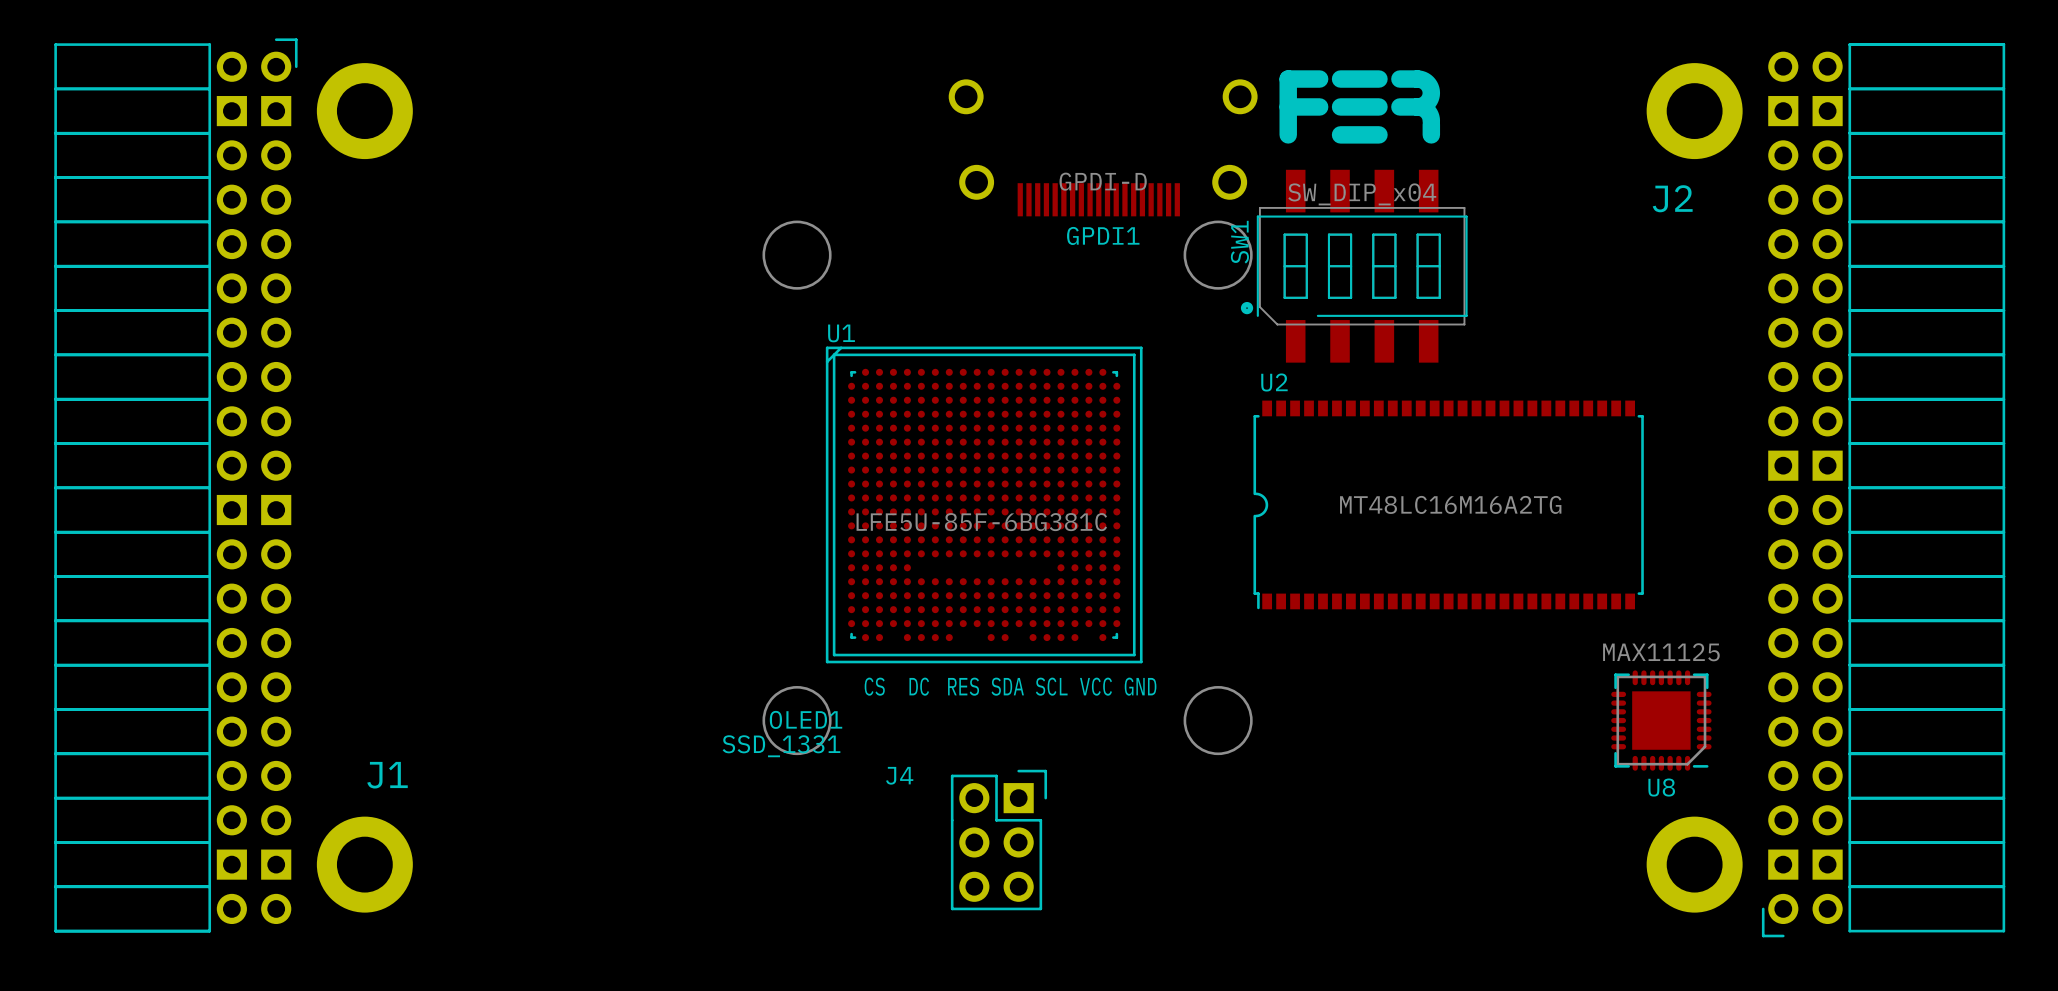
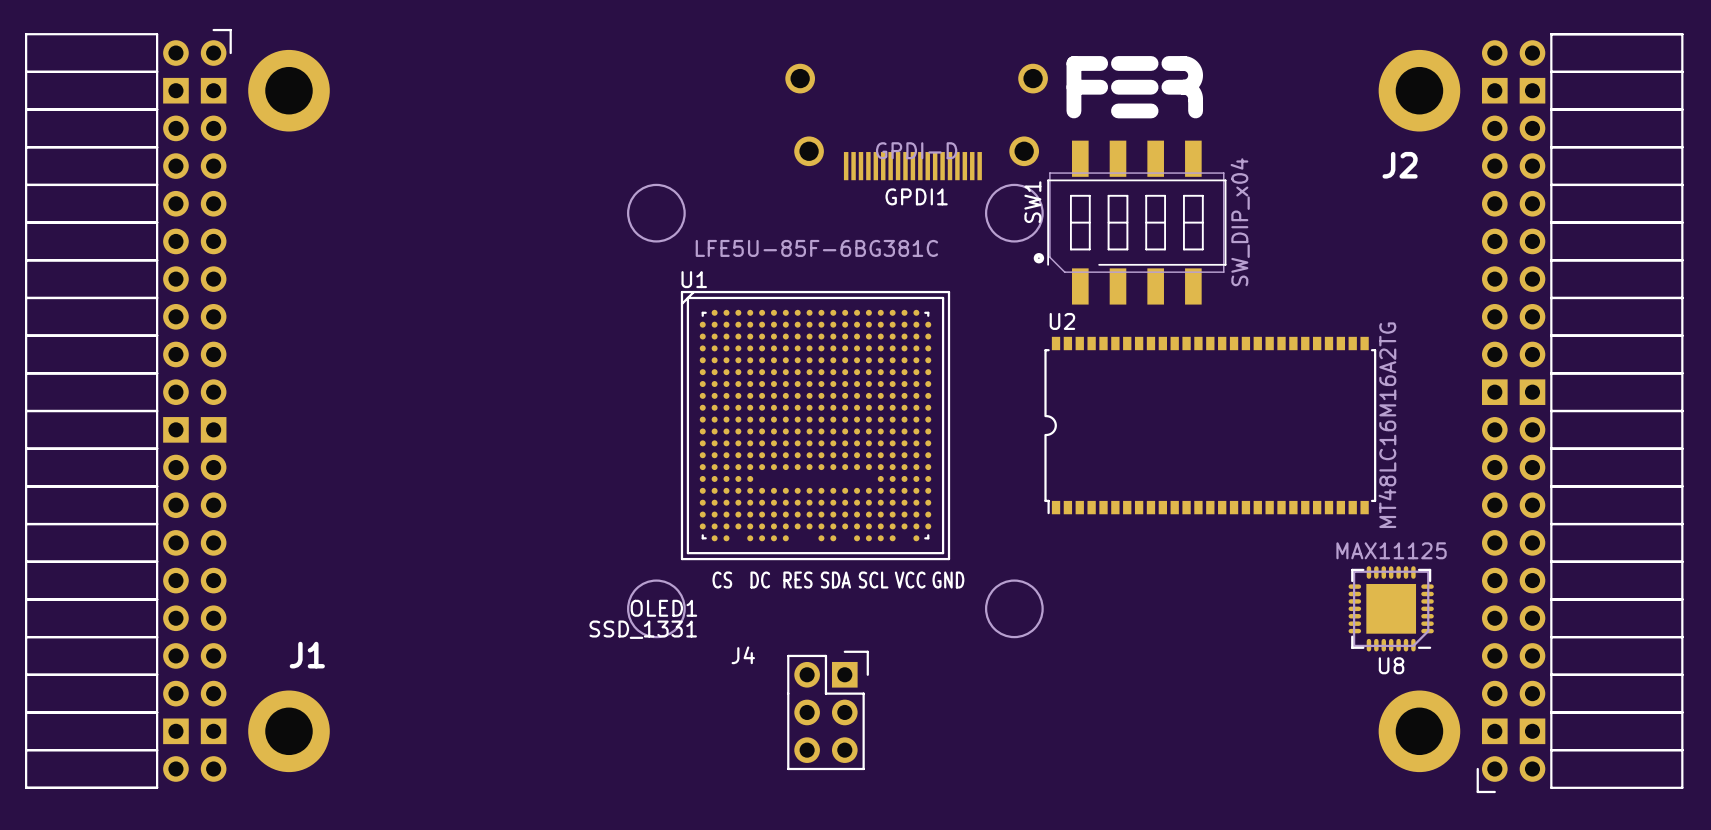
SW1 value rotation: 0° (1362, 194) -> 90° counterclockwise (1240, 222)
U2 value rotation: 0° (1450, 504) -> 90° counterclockwise (1387, 425)
U1 value position: LFE5U-85F-6BG381C (981, 522) -> LFE5U-85F-6BG381C (816, 248)

